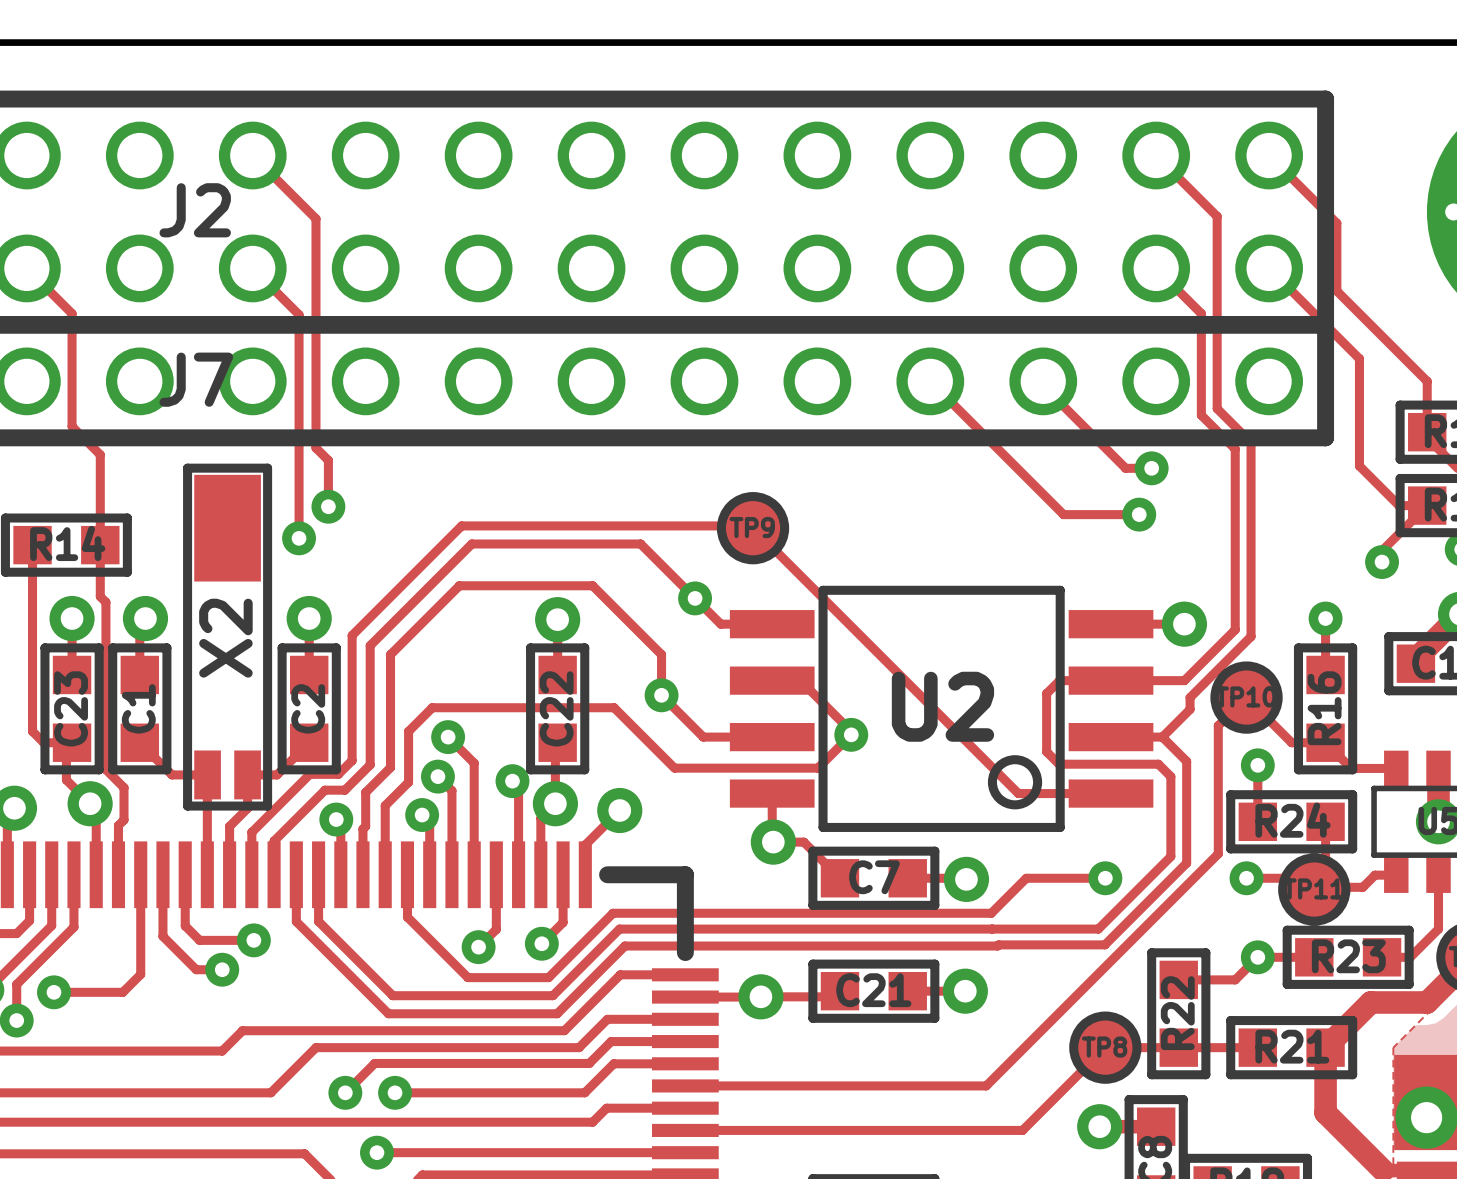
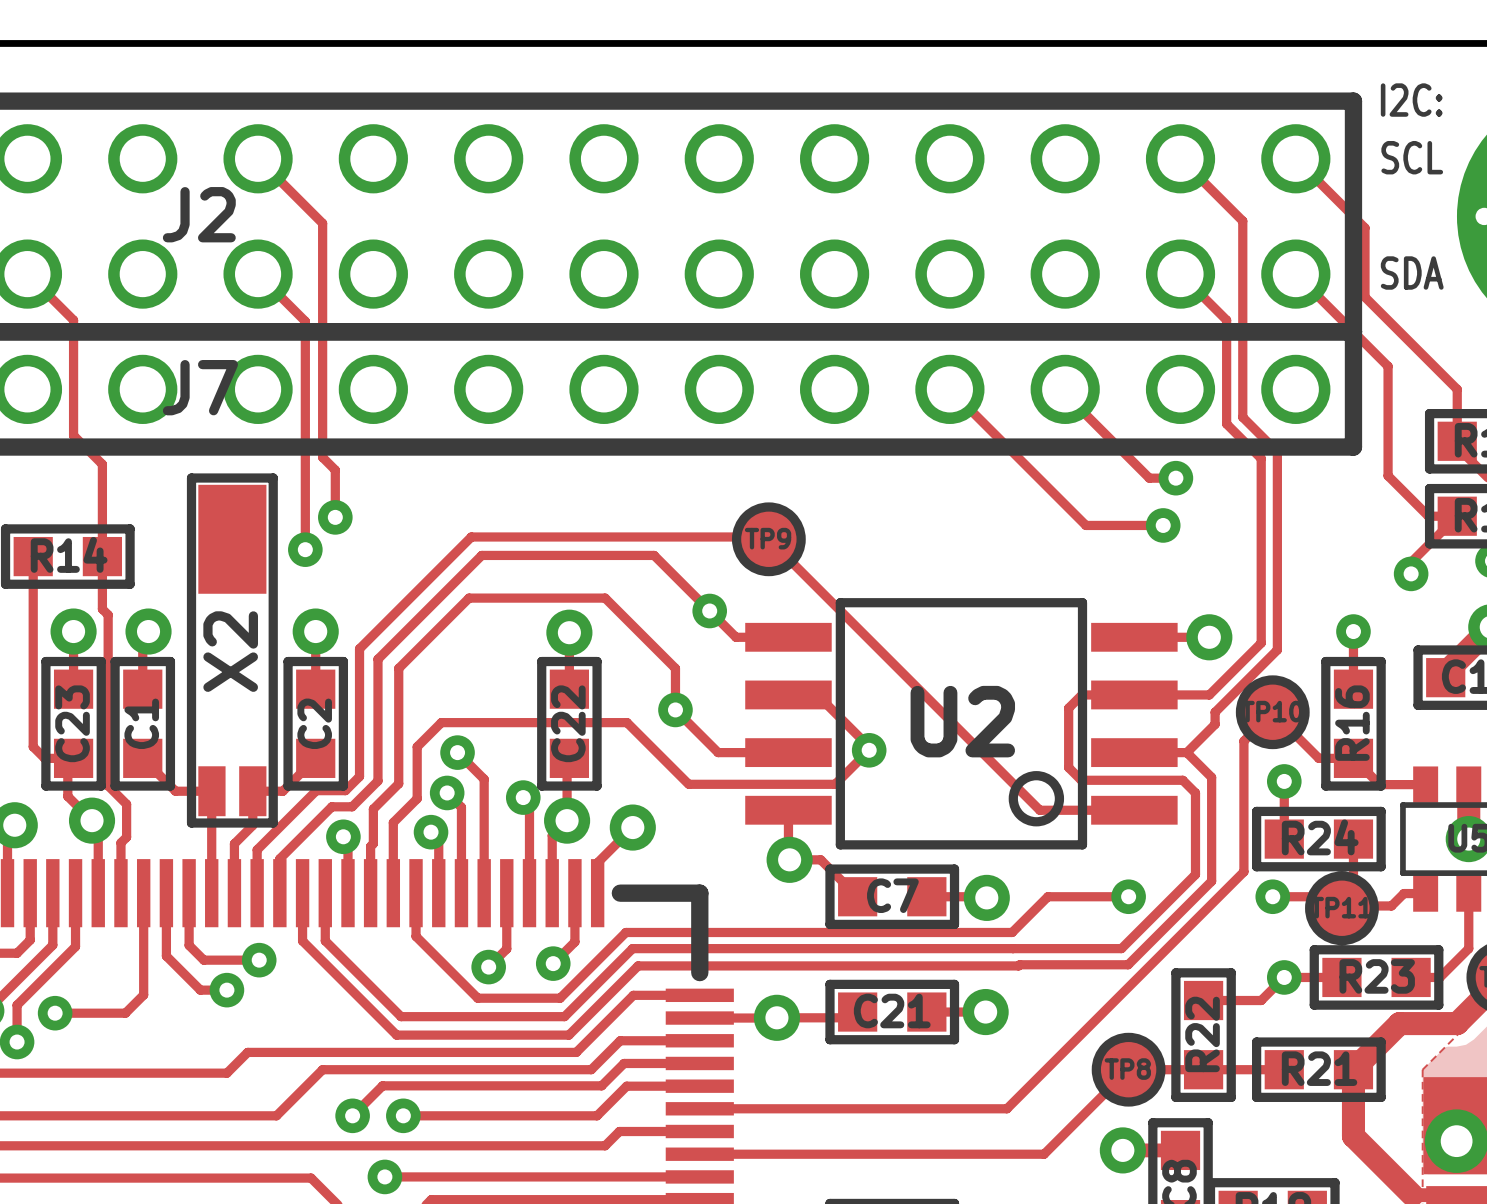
text: none -> I2C: (1411, 100)
text: none -> SCL (1412, 157)
text: none -> SDA (1412, 273)

